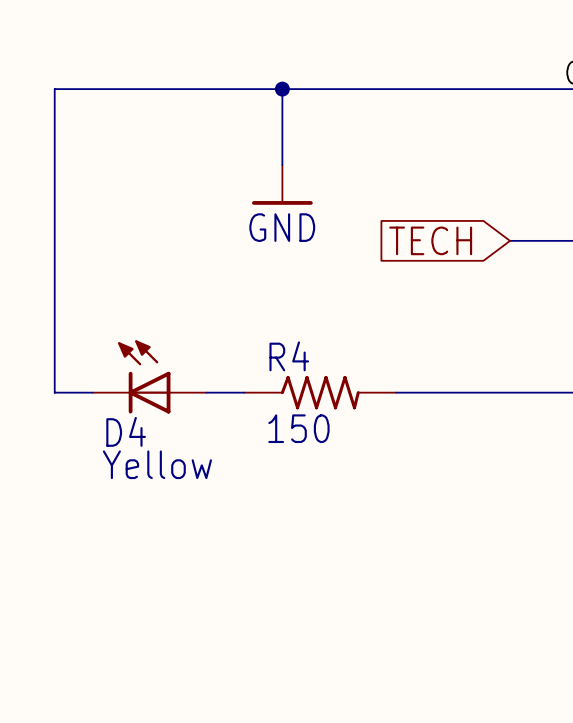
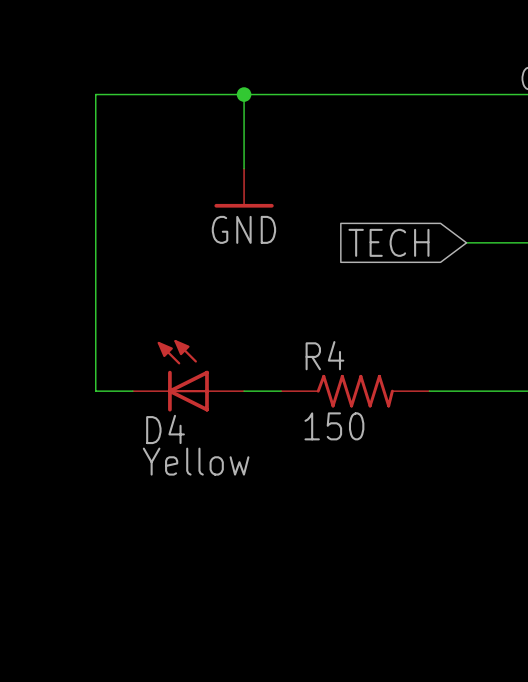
wire: (130, 89) (54, 89) (54, 392) (92, 392) -> (95, 94) (95, 391) (132, 391)
D4 position: (149, 376) -> (188, 375)
R4 position: (320, 392) -> (355, 391)

